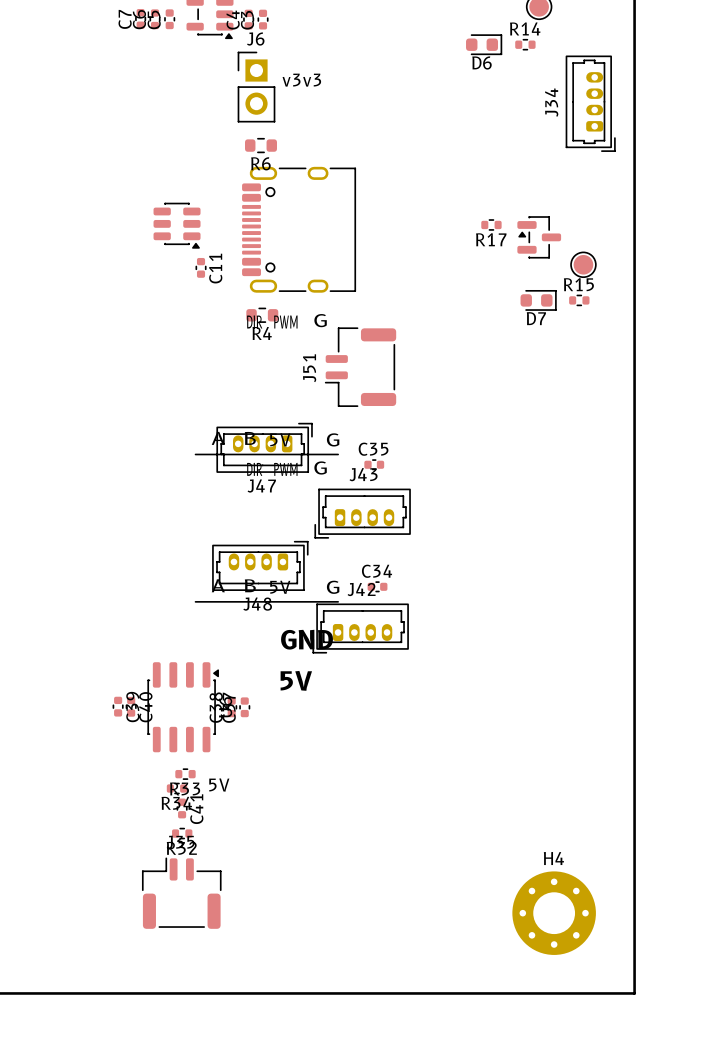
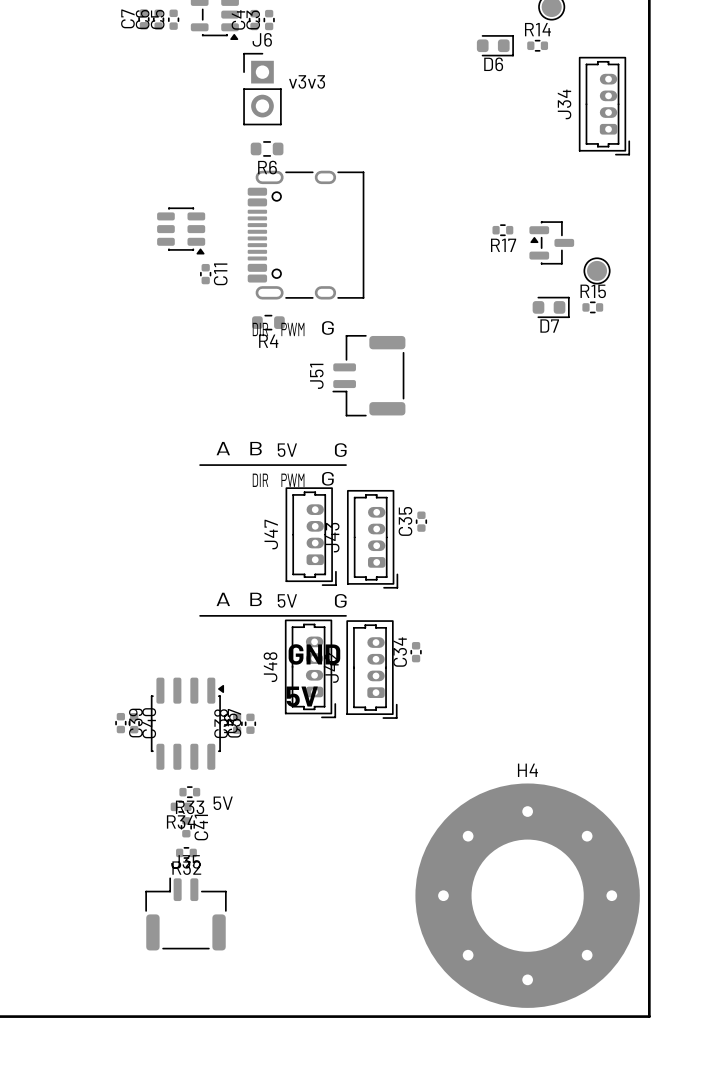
J47 rotation: 0° (264, 447) -> 90° clockwise (311, 536)
J47 position: (264, 447) -> (311, 536)
C35 rotation: 0° (374, 464) -> 90° clockwise (421, 521)
C35 position: (374, 464) -> (421, 521)
J43 rotation: 0° (362, 513) -> 90° counterclockwise (372, 539)
J48 rotation: 0° (260, 565) -> 90° clockwise (310, 668)
J48 position: (260, 565) -> (310, 668)
C34 rotation: 0° (377, 586) -> 90° clockwise (416, 652)
C34 position: (377, 586) -> (416, 652)
J42 rotation: 0° (360, 628) -> 90° counterclockwise (371, 669)
H4 name position: H4 (553, 858) -> H4 (527, 770)
H4 footprint: [512, 871, 596, 955] -> [415, 783, 640, 1008]

